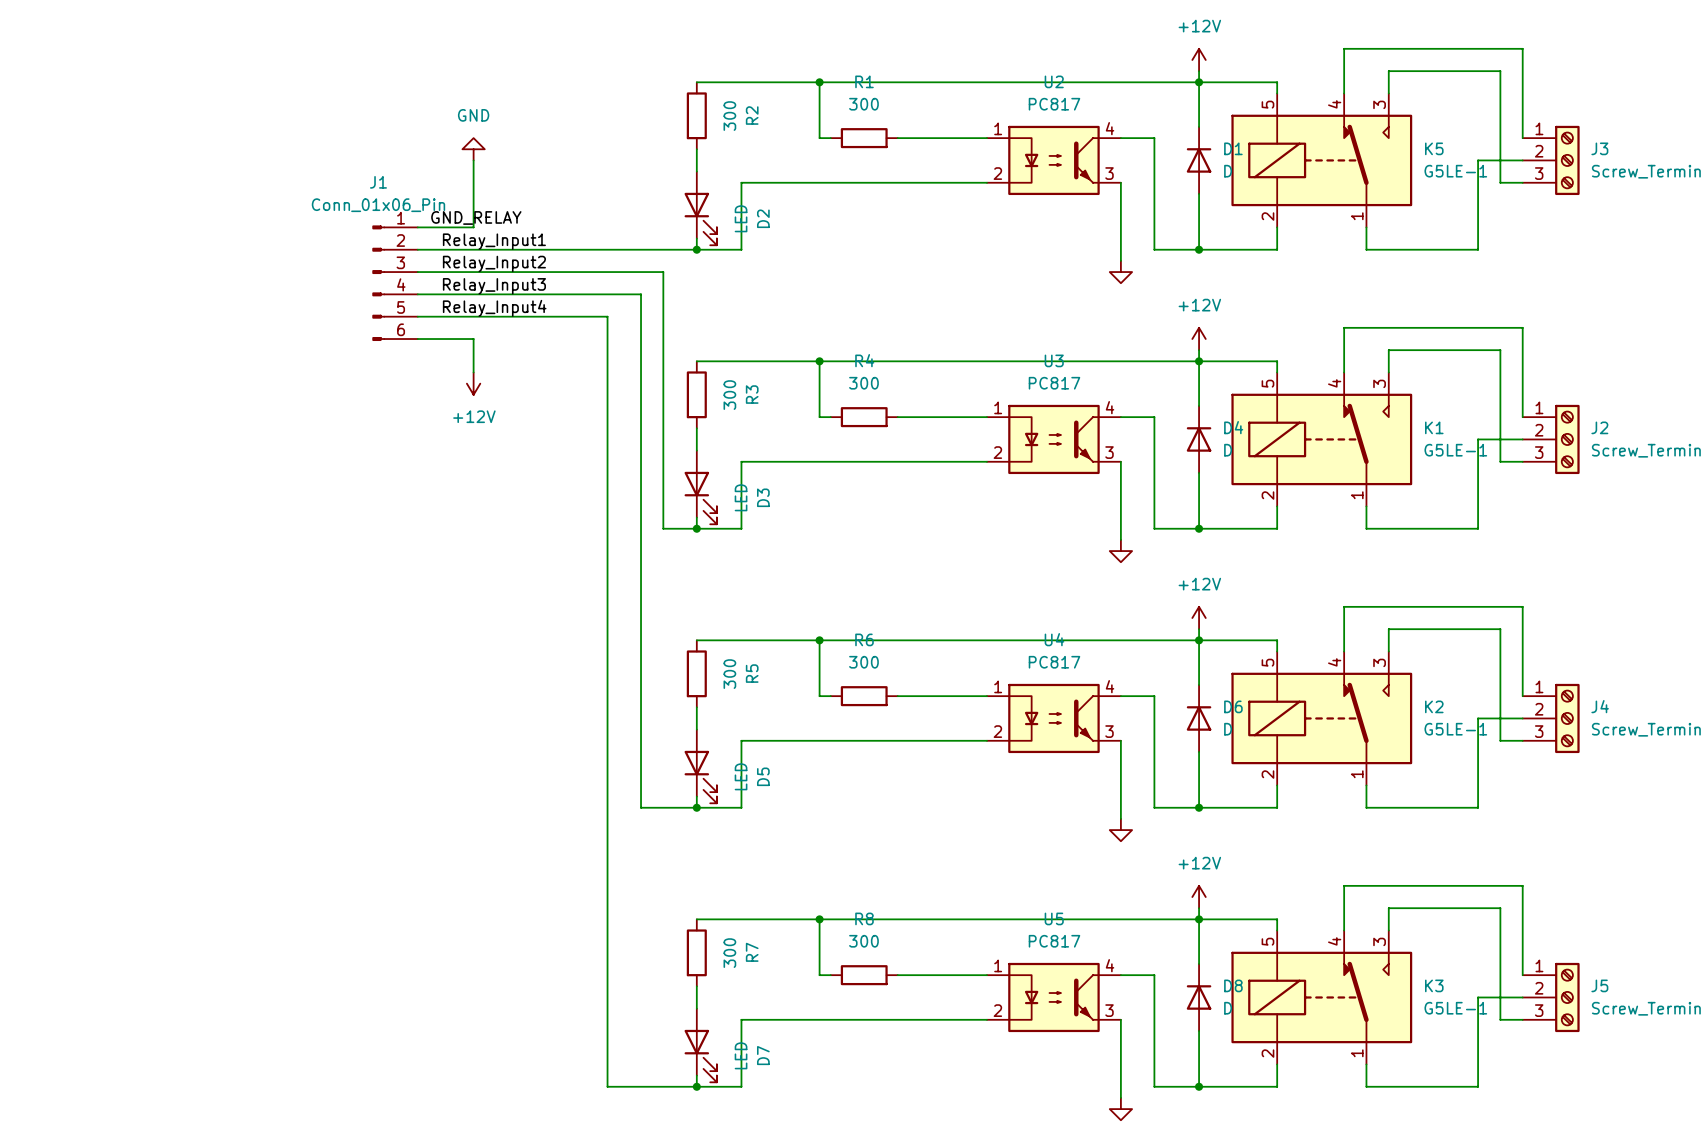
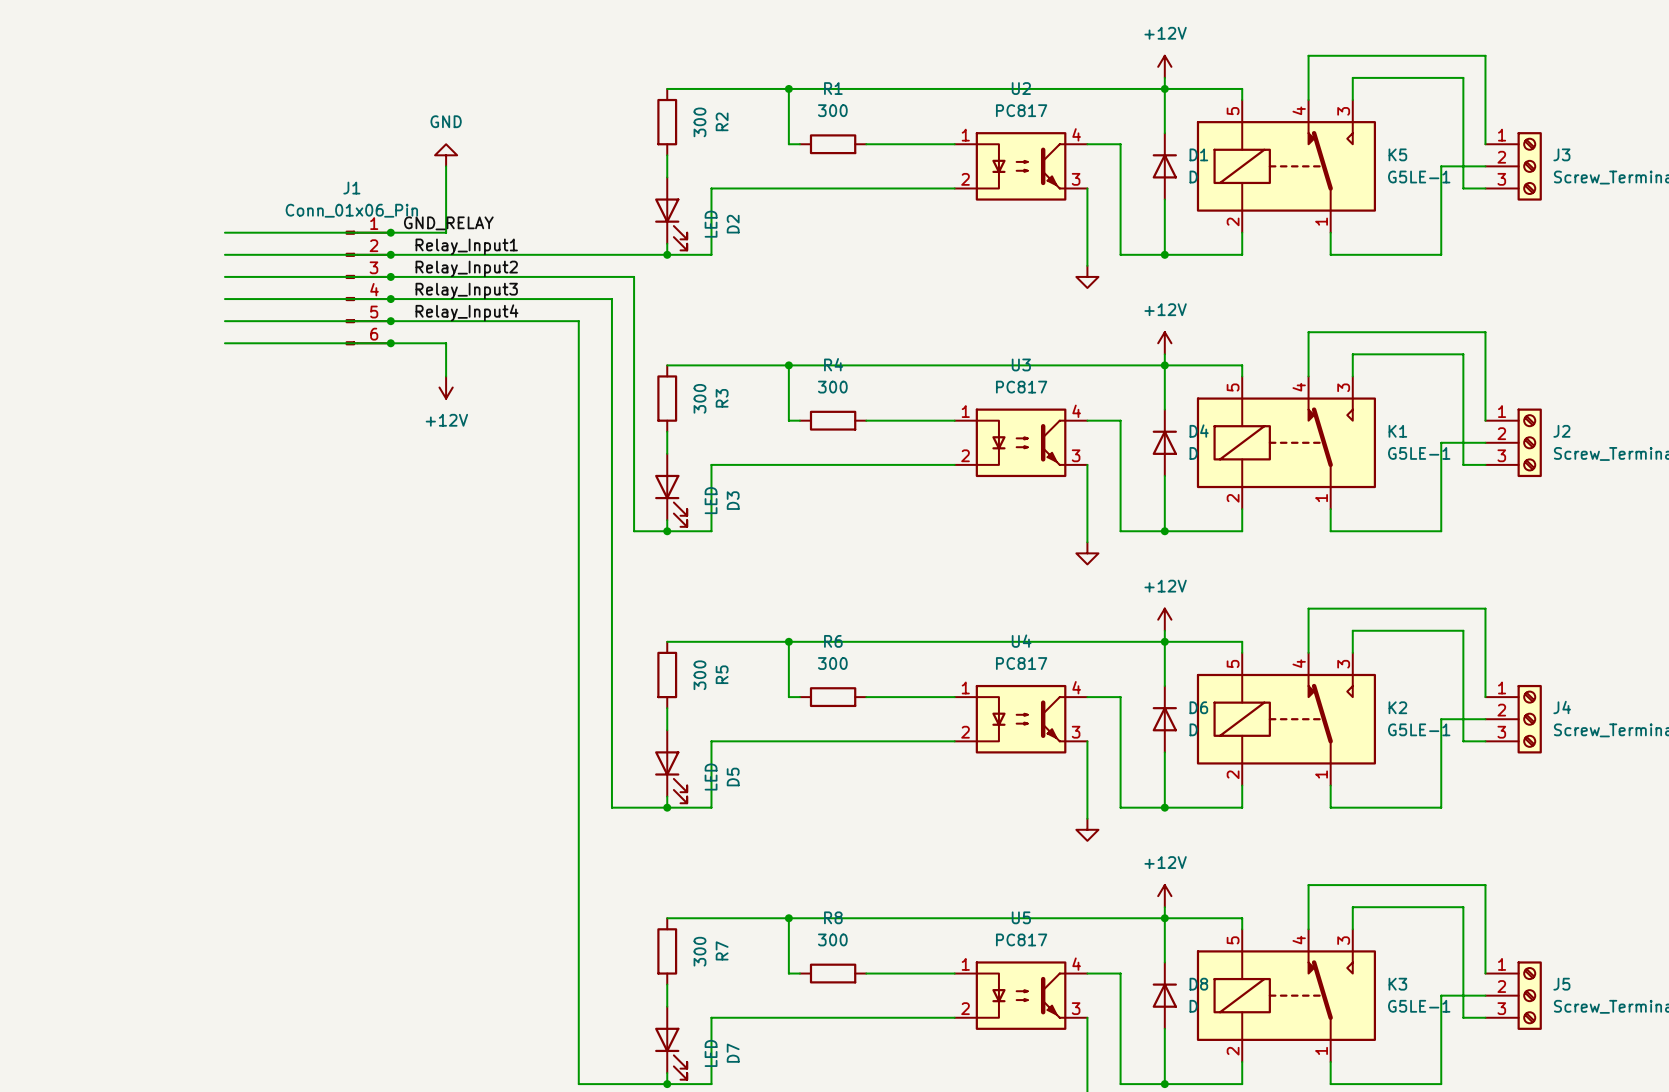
wire: none -> (224, 232) (390, 232)
junction: none -> (390, 232)
wire: none -> (224, 254) (390, 254)
junction: none -> (390, 254)
wire: none -> (224, 276) (390, 276)
junction: none -> (390, 276)
wire: none -> (224, 299) (390, 299)
junction: none -> (390, 299)
wire: none -> (224, 321) (390, 321)
junction: none -> (390, 321)
wire: none -> (224, 343) (390, 343)
junction: none -> (390, 343)

